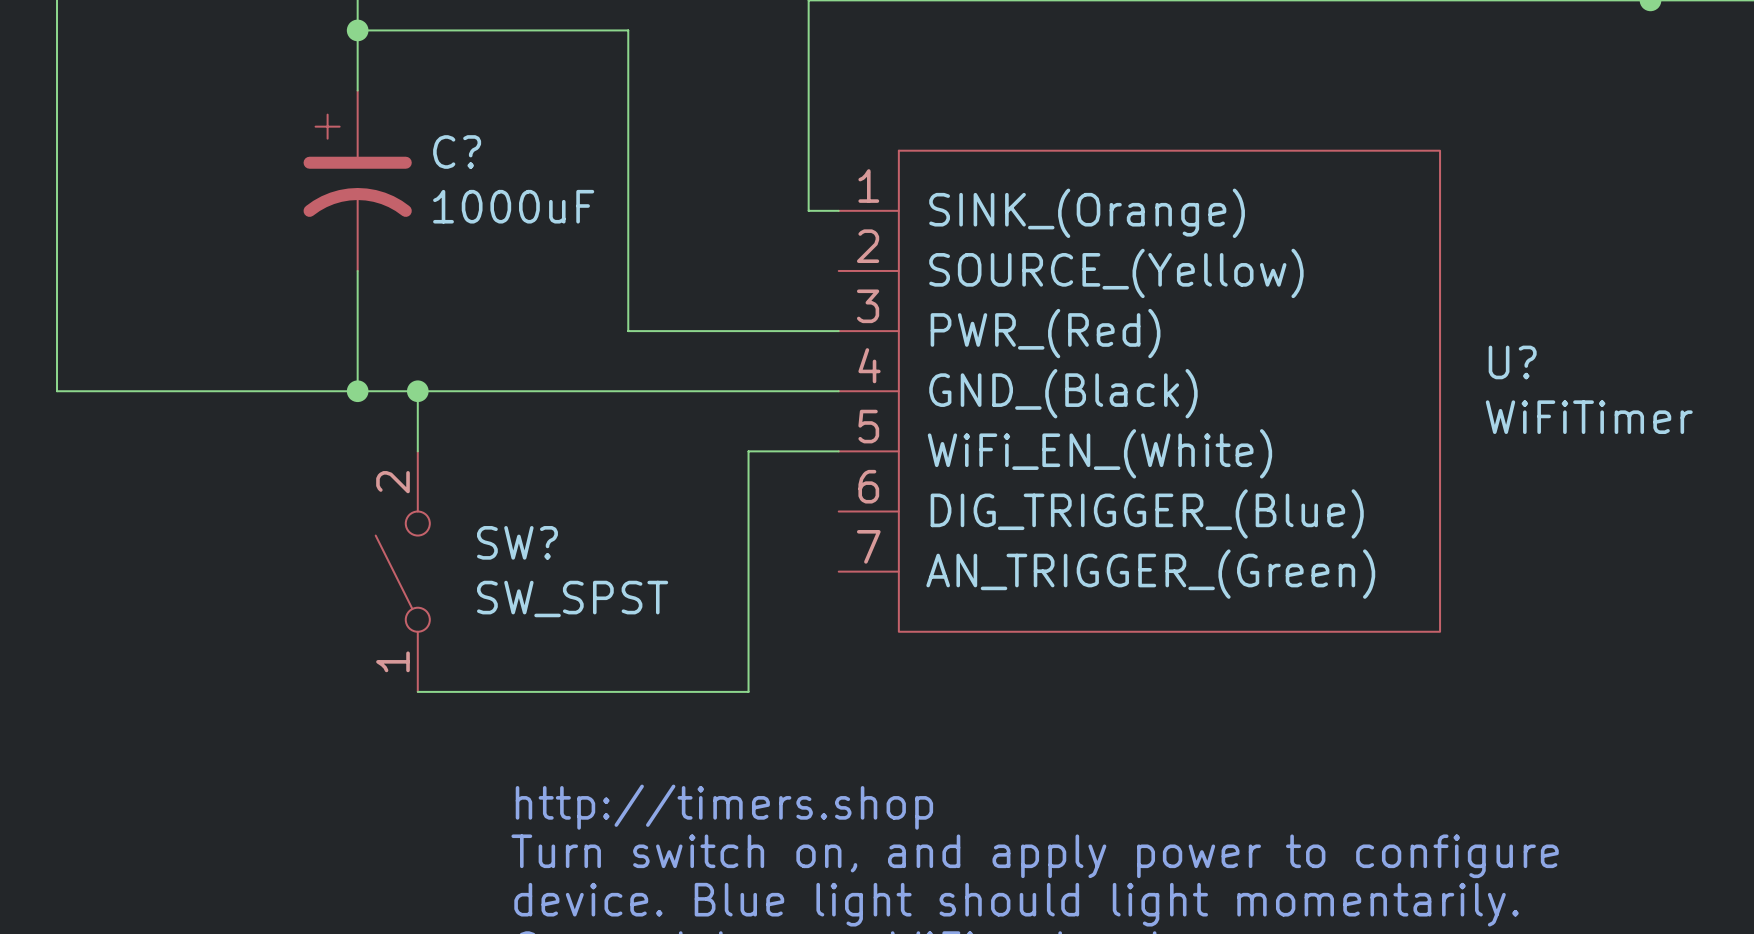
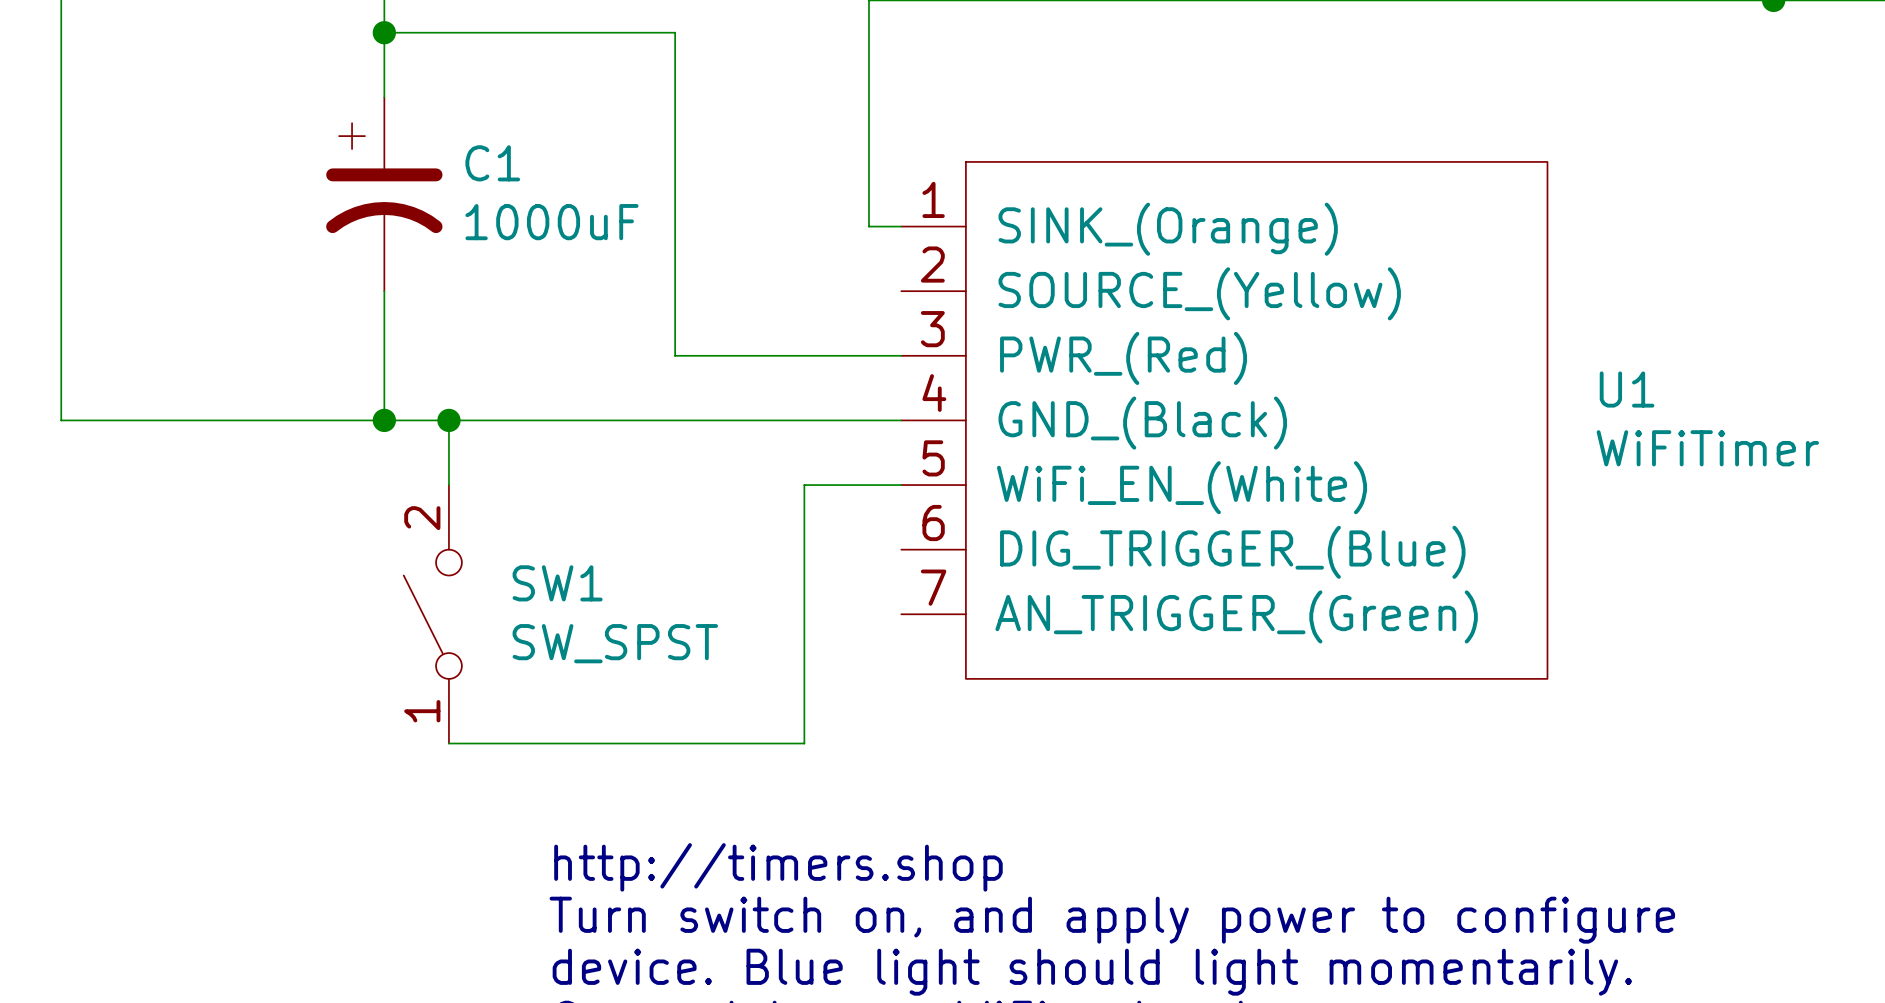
C? name: C? (457, 151) -> C1 (492, 163)
U? name: U? (1512, 362) -> U1 (1627, 389)
SW? name: SW? (517, 542) -> SW1 (557, 583)

